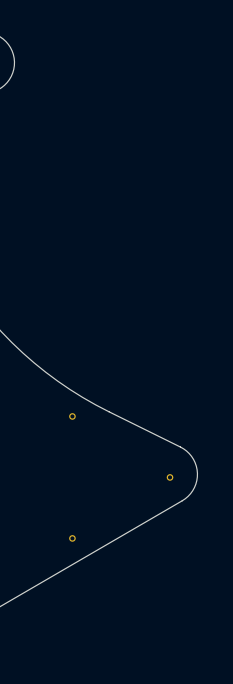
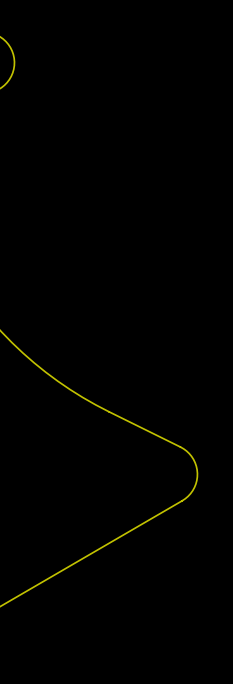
part: (72, 416) -> none
part: (170, 477) -> none
part: (72, 538) -> none

